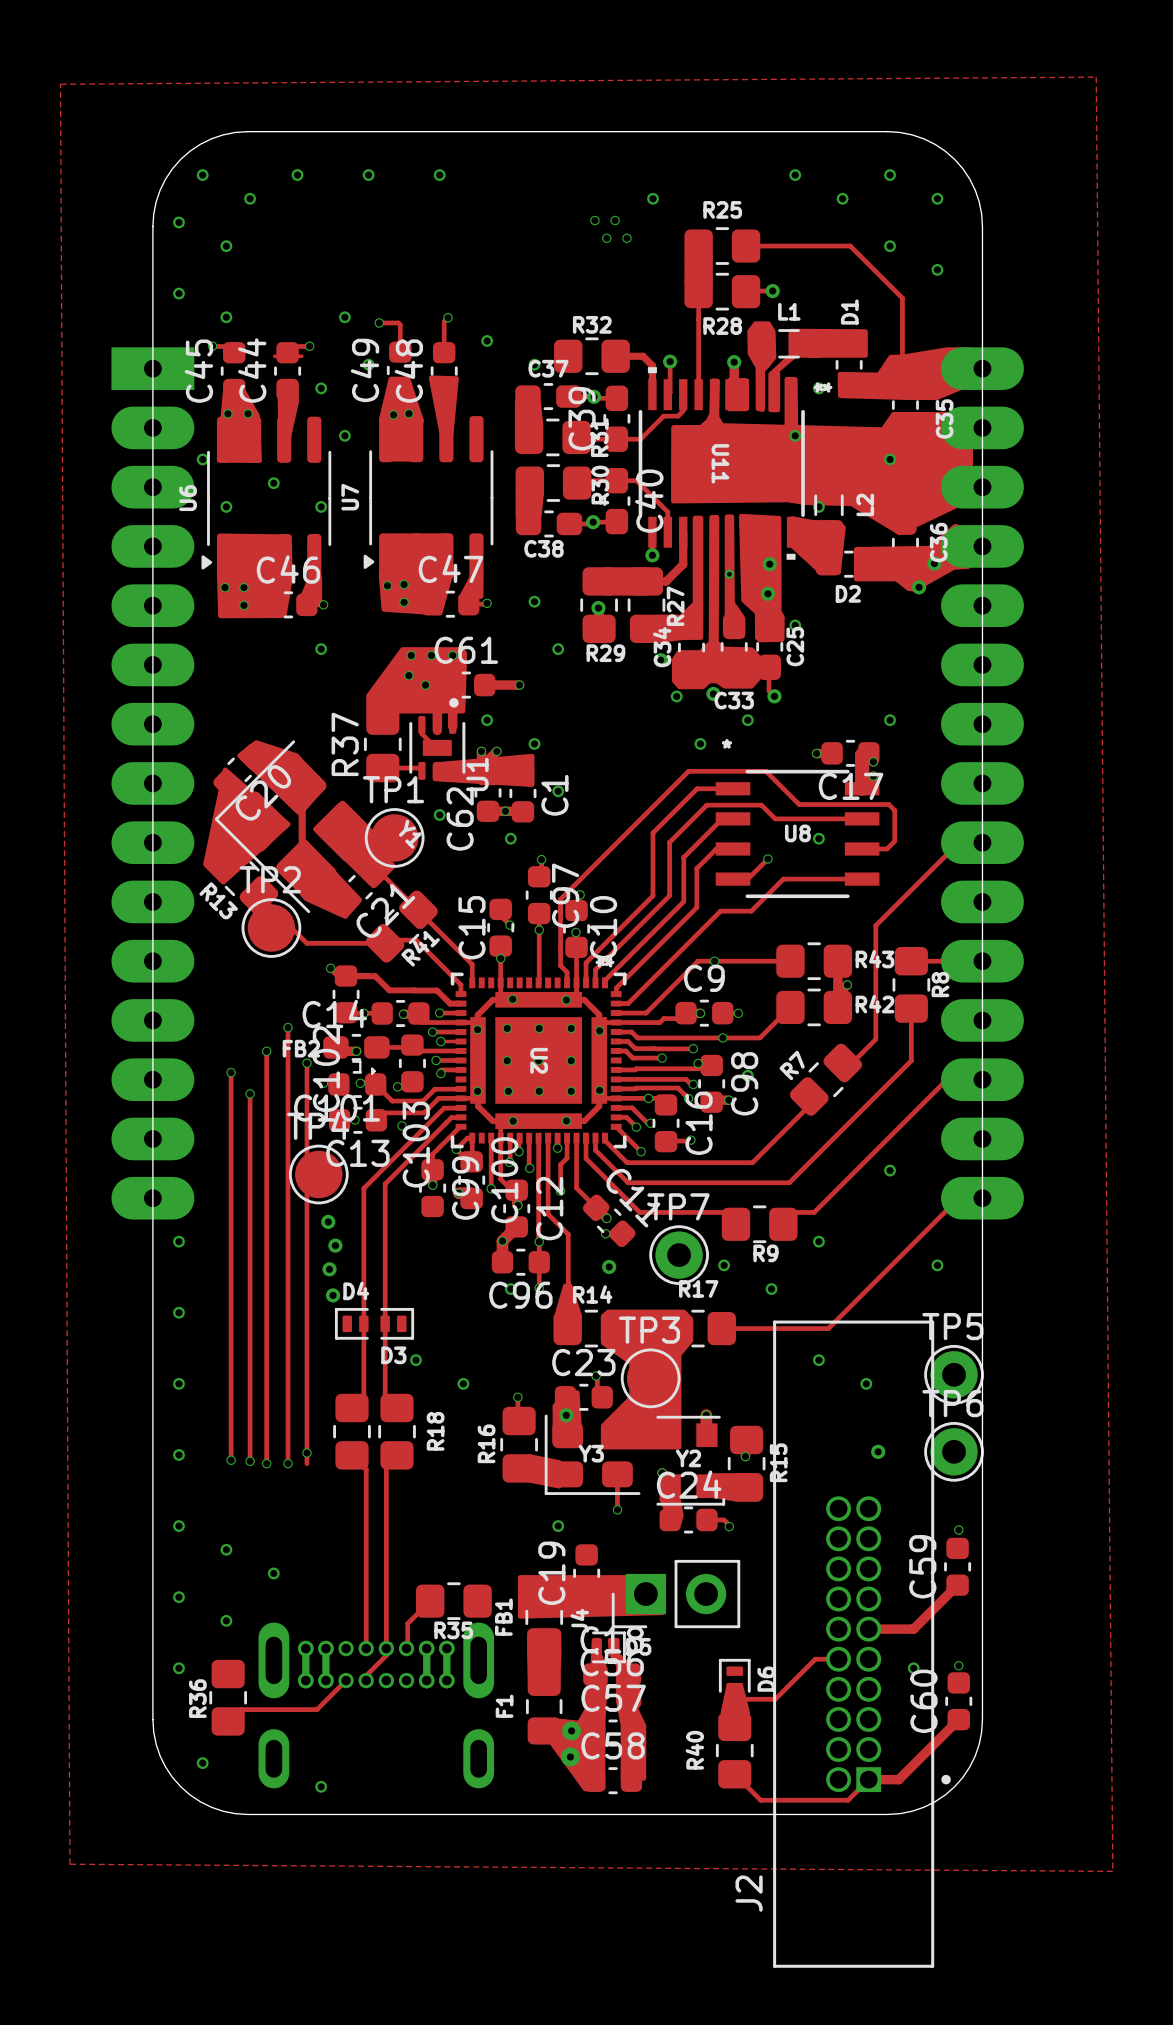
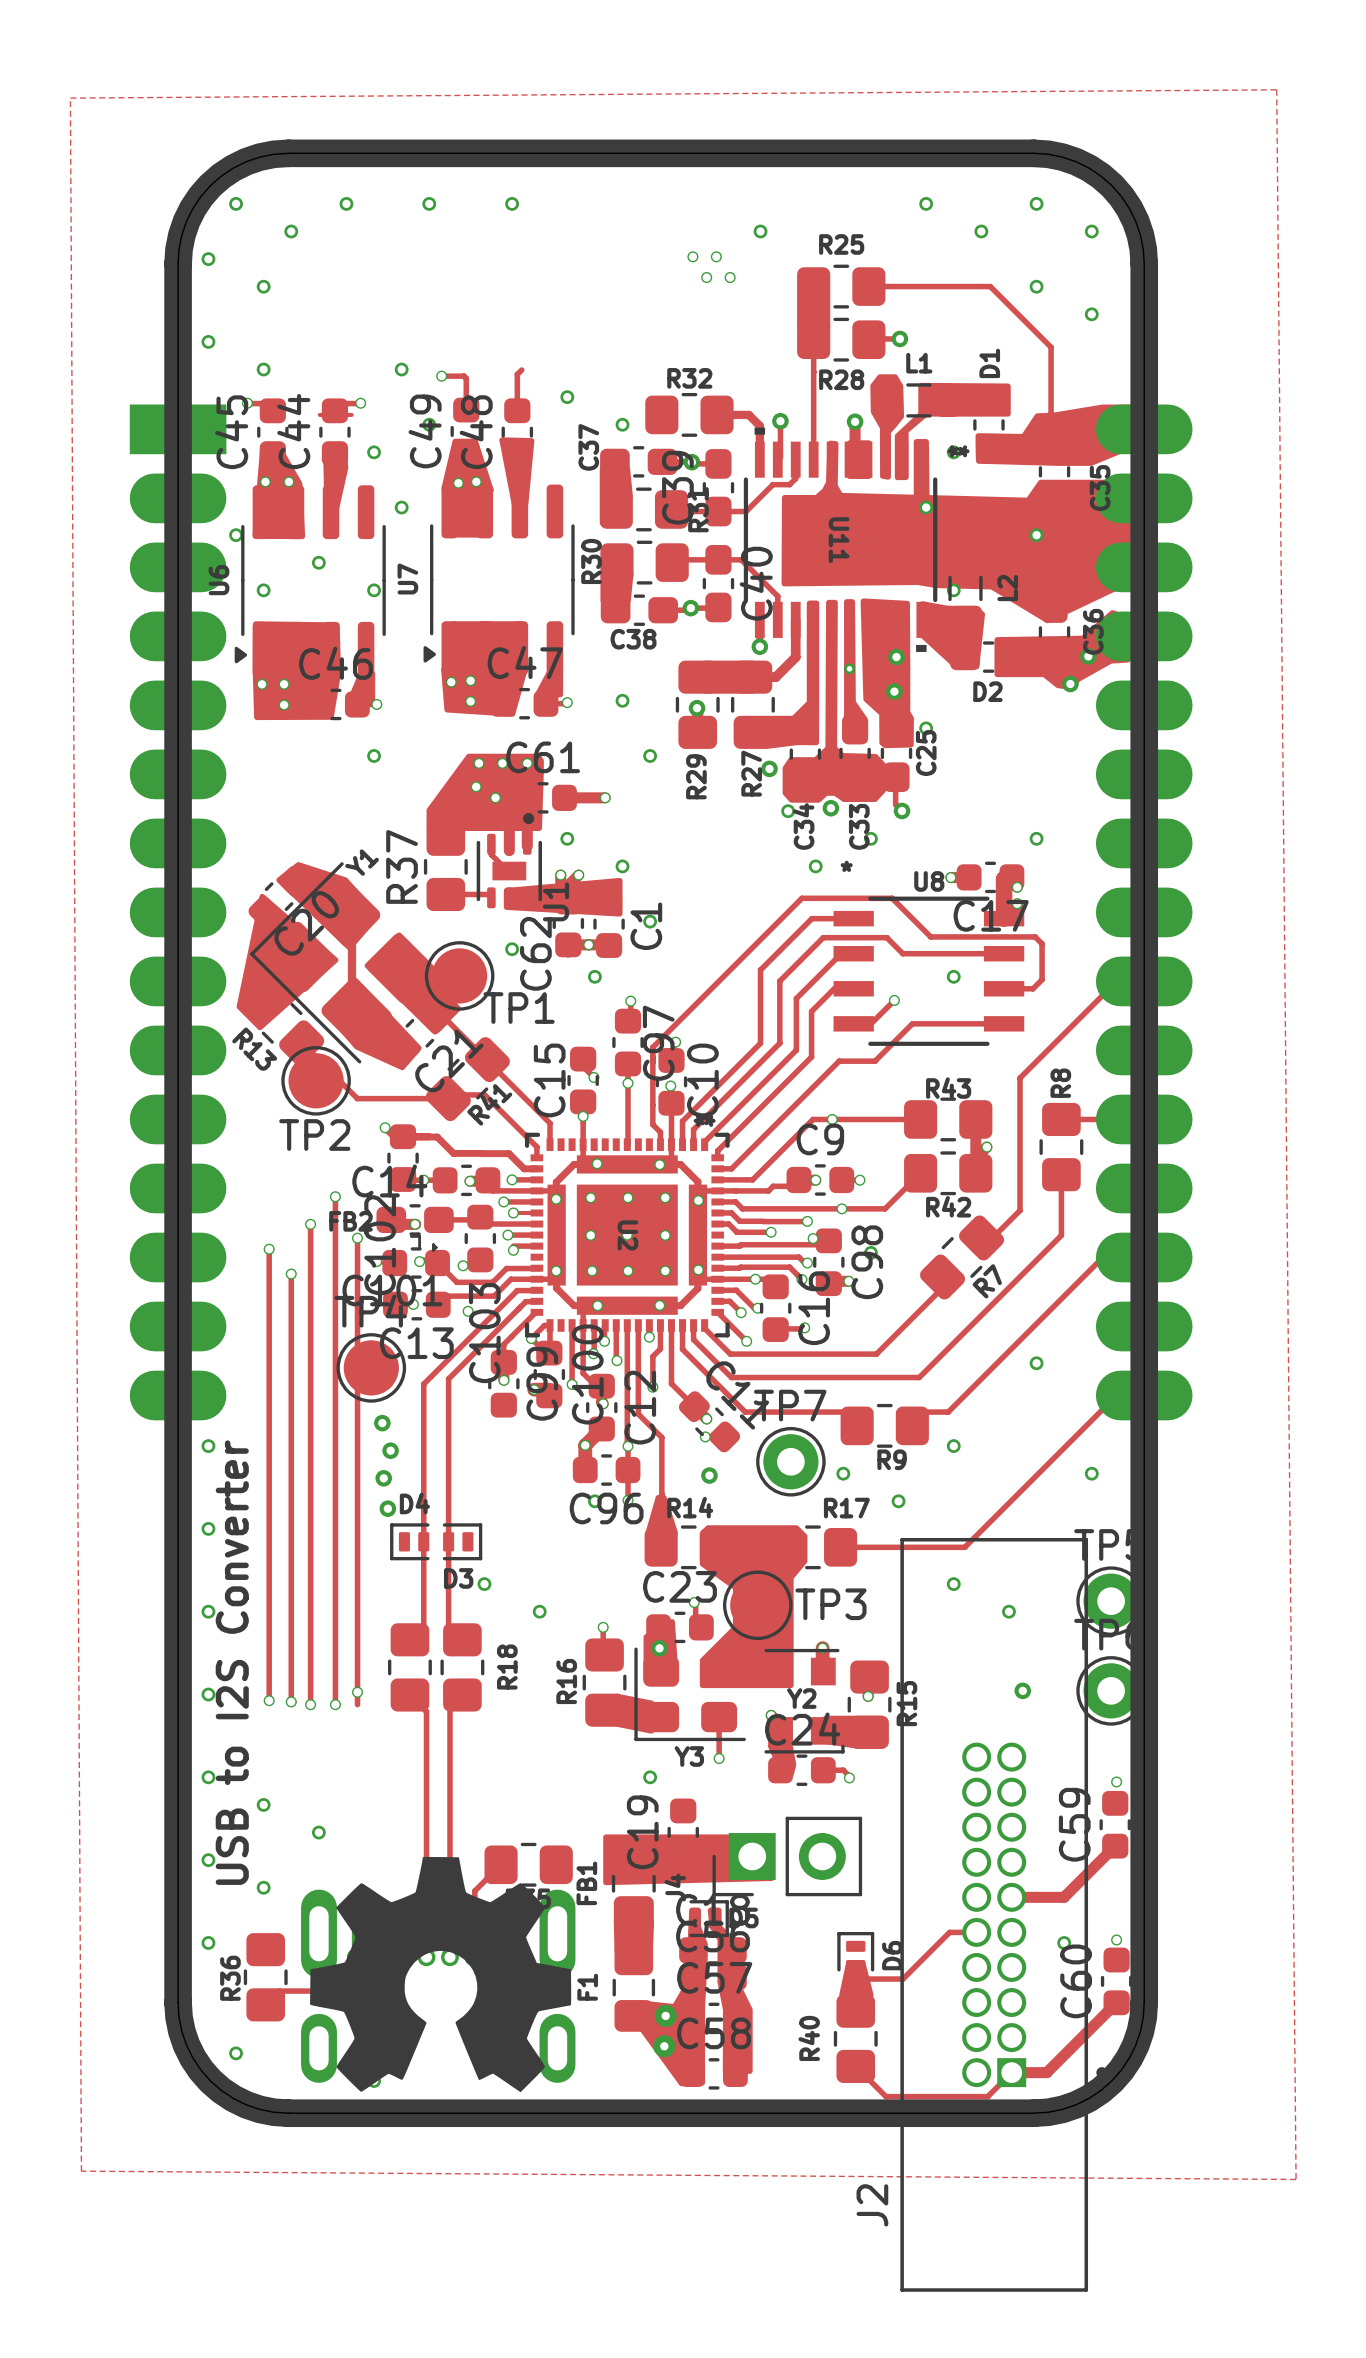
line: none -> (288, 153) (1048, 154) (1076, 161) (1101, 176) (1121, 196) (1135, 221) (1140, 235) (1144, 263) (1144, 2002) (1140, 2031) (1129, 2058) (1111, 2080) (1089, 2098) (1076, 2104) (1062, 2109) (1033, 2113) (274, 2112) (246, 2104) (221, 2090) (200, 2070) (186, 2045) (179, 2017) (178, 2002) (178, 263) (181, 235) (186, 221) (192, 208) (210, 185) (233, 168) (246, 161) (259, 157) (288, 153)
via: (447, 317) -> none
C37 name rotation: 0° (548, 368) -> 90° counterclockwise (588, 447)
R30 name position: R30 (600, 485) -> R30 (591, 561)
R27 name position: R27 (675, 606) -> R27 (751, 773)
C34 name position: C34 (662, 647) -> C34 (803, 826)
R29 name rotation: 0° (605, 653) -> 90° counterclockwise (696, 776)
C33 name rotation: 0° (734, 700) -> 90° counterclockwise (859, 826)
TP1 name position: TP1 (393, 789) -> TP1 (519, 1008)
U8 name position: U8 (797, 833) -> U8 (929, 881)
Y1 name rotation: 0° (410, 834) -> 90° counterclockwise (362, 862)
Y1 name position: Y1 (410, 834) -> Y1 (362, 862)
TP2 name position: TP2 (270, 879) -> TP2 (314, 1134)
R43 name position: R43 (874, 959) -> R43 (948, 1088)
R8 name position: R8 (940, 984) -> R8 (1060, 1083)
R42 name position: R42 (874, 1004) -> R42 (948, 1206)
R7 name position: R7 (792, 1065) -> R7 (987, 1281)
R17 name position: R17 (698, 1288) -> R17 (846, 1508)
TP3 name position: TP3 (649, 1330) -> TP3 (830, 1604)
text: none -> USB to I2S Converter (232, 1662)
Y3 name position: Y3 (591, 1453) -> Y3 (689, 1756)
drawing: none -> [310, 1856, 572, 2093]

